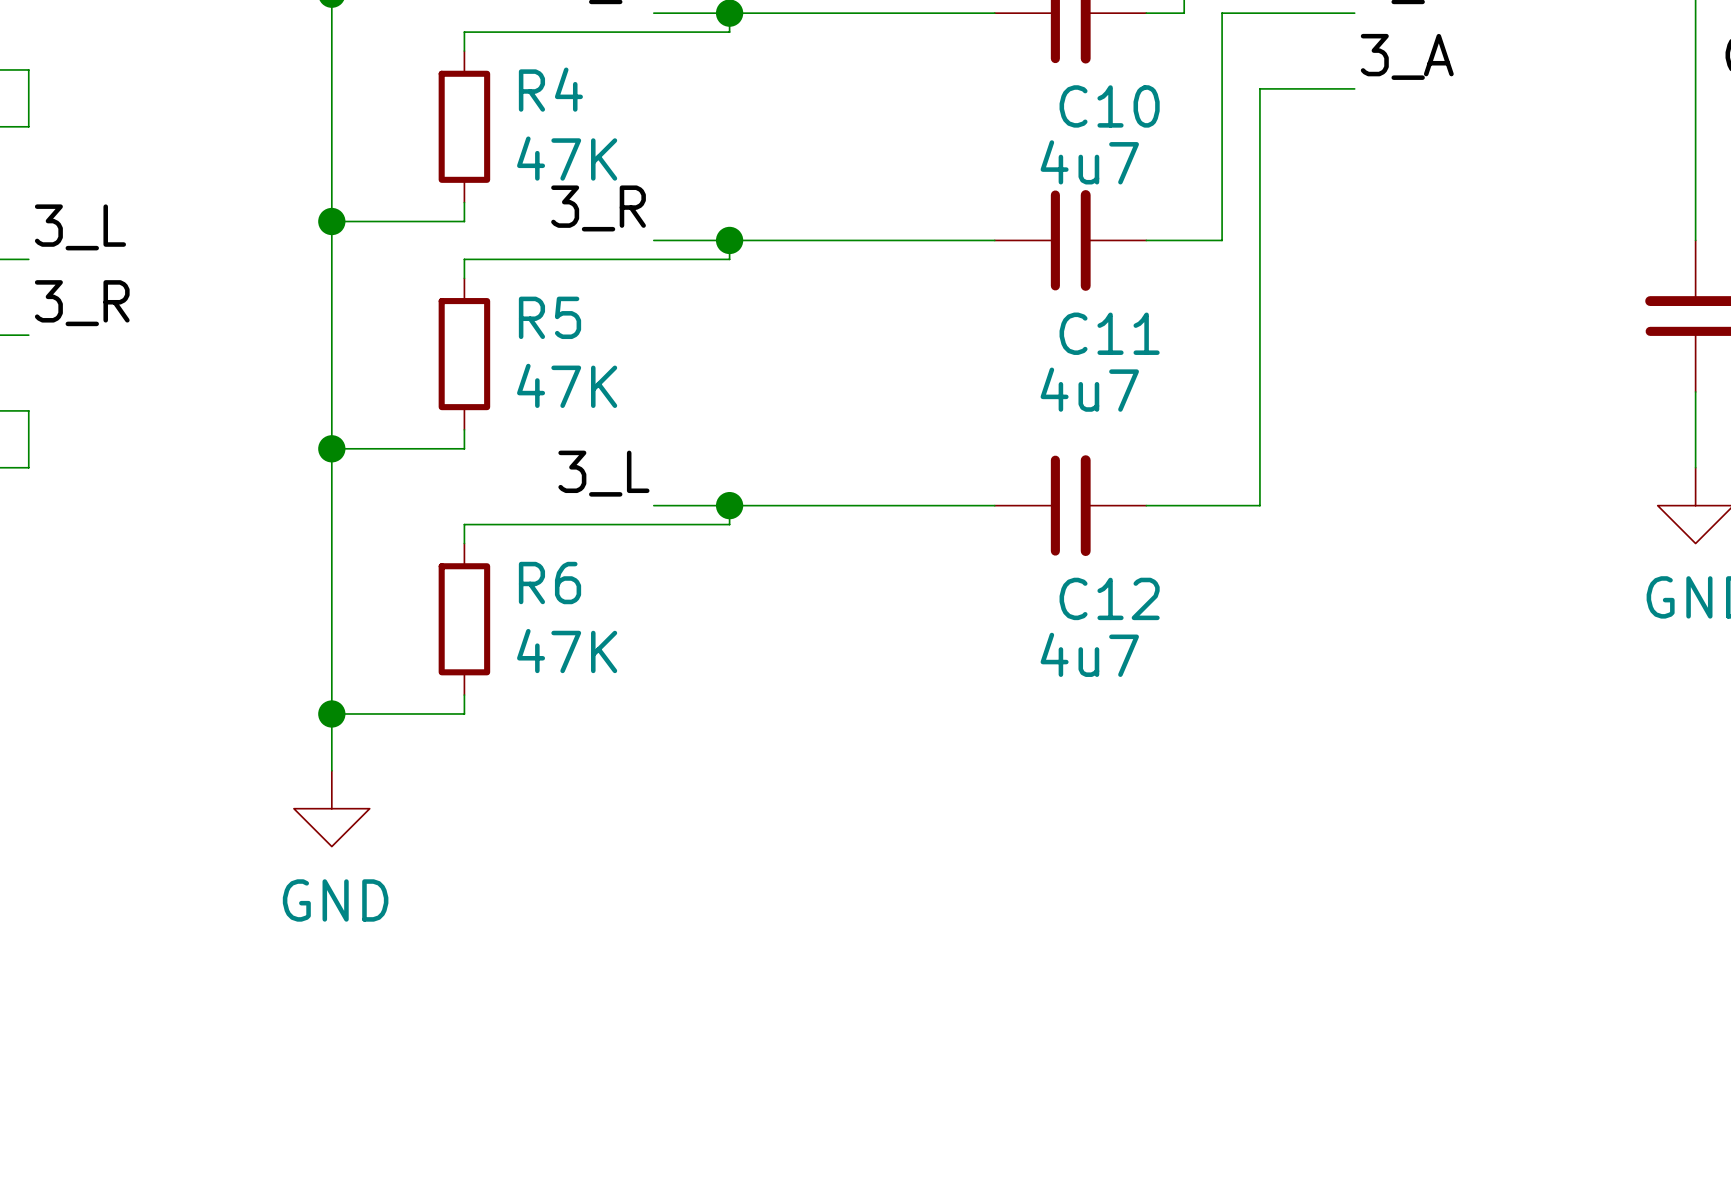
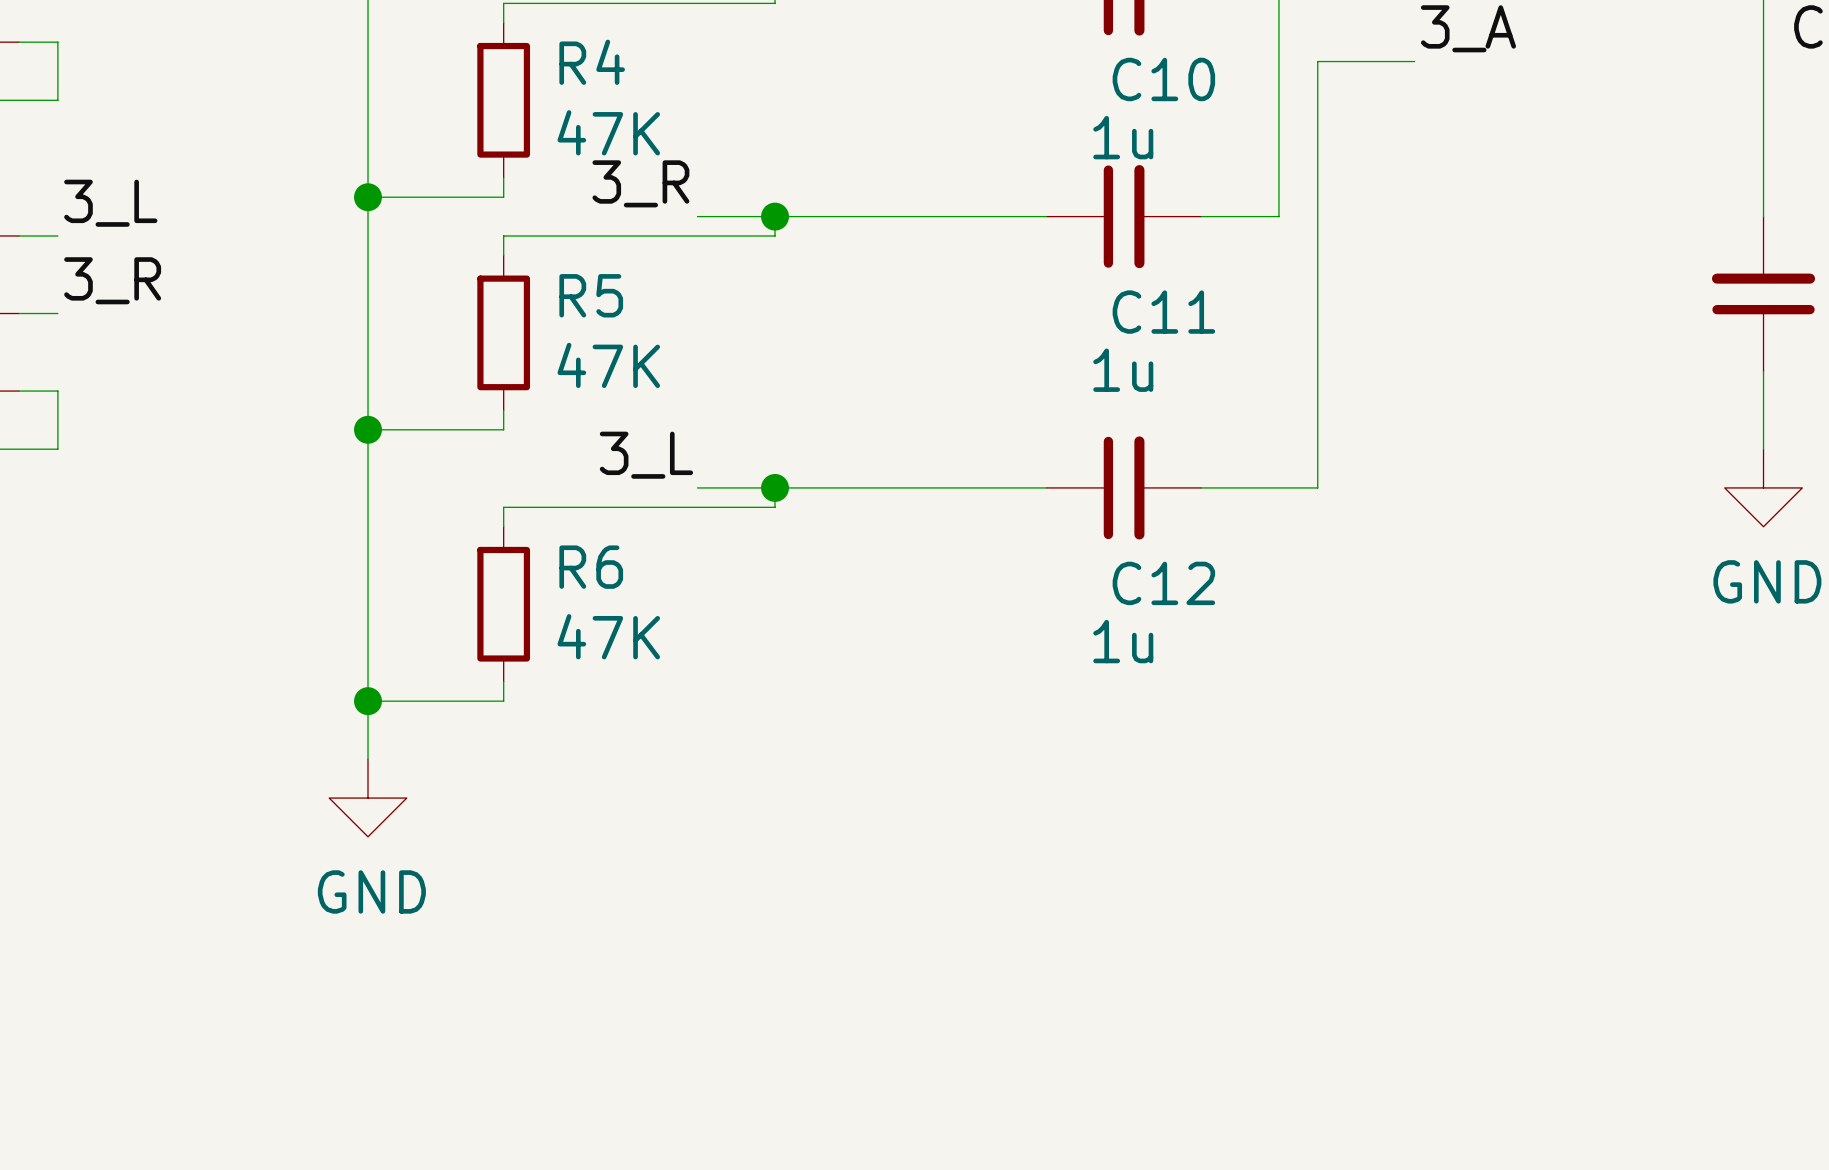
C10 value: 4u7 (1089, 162) -> 1u (1123, 137)
C11 value: 4u7 (1089, 389) -> 1u (1123, 370)
C12 value: 4u7 (1089, 654) -> 1u (1123, 641)

